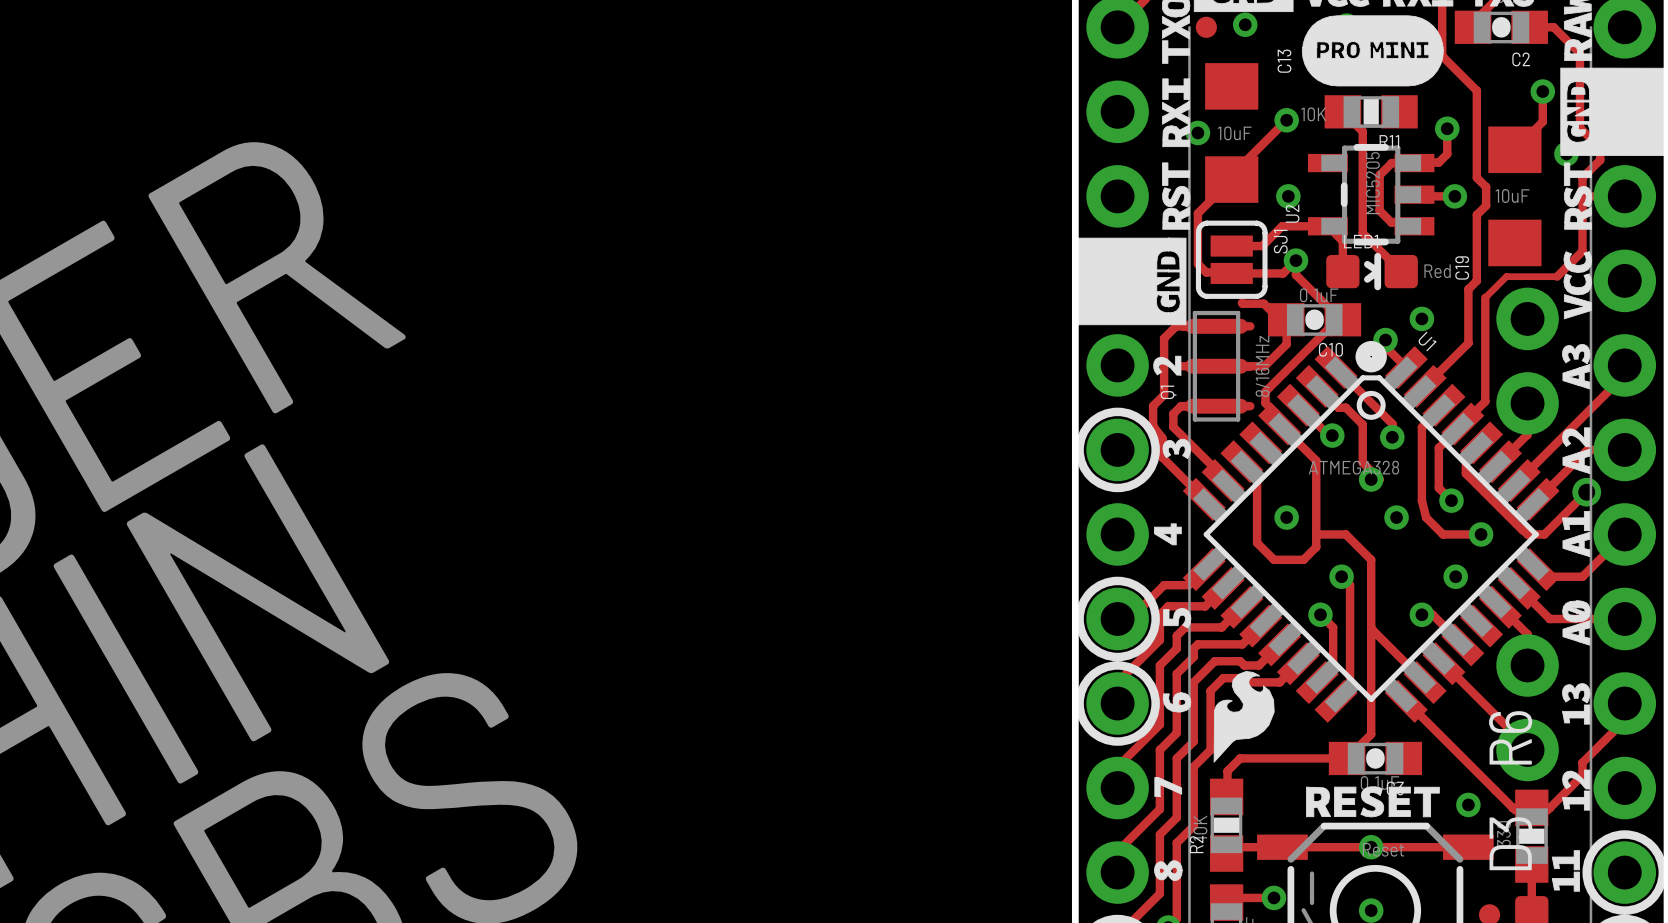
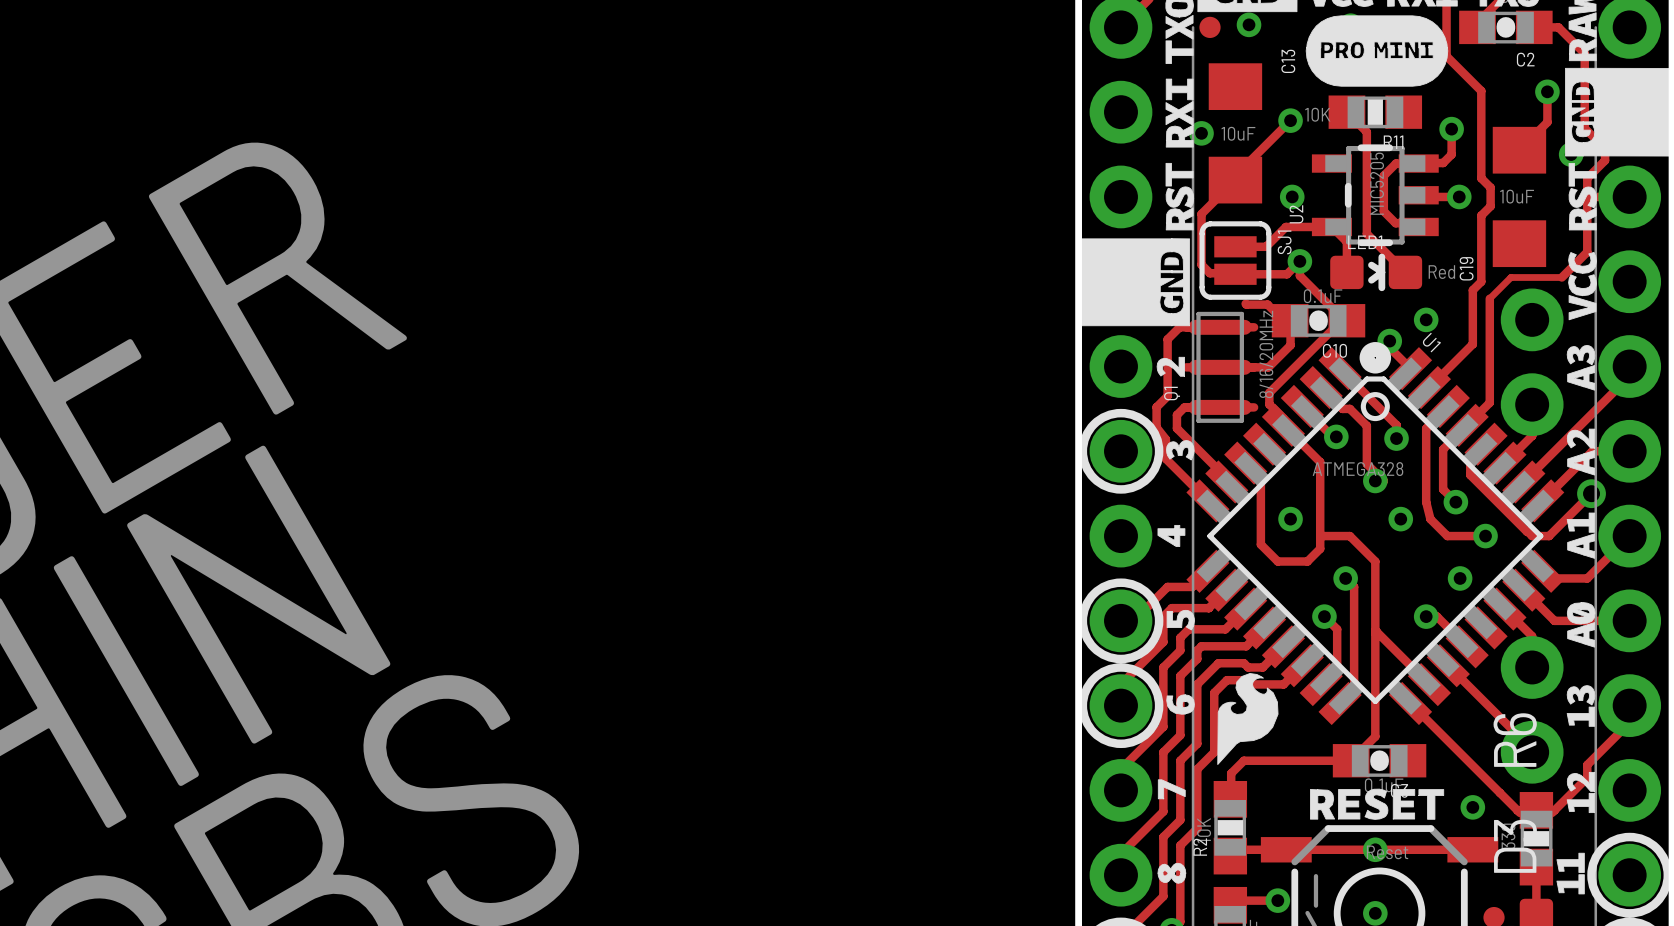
Q1 value: 8/16MHz (1262, 366) -> 8/16/20MHz (1266, 354)

